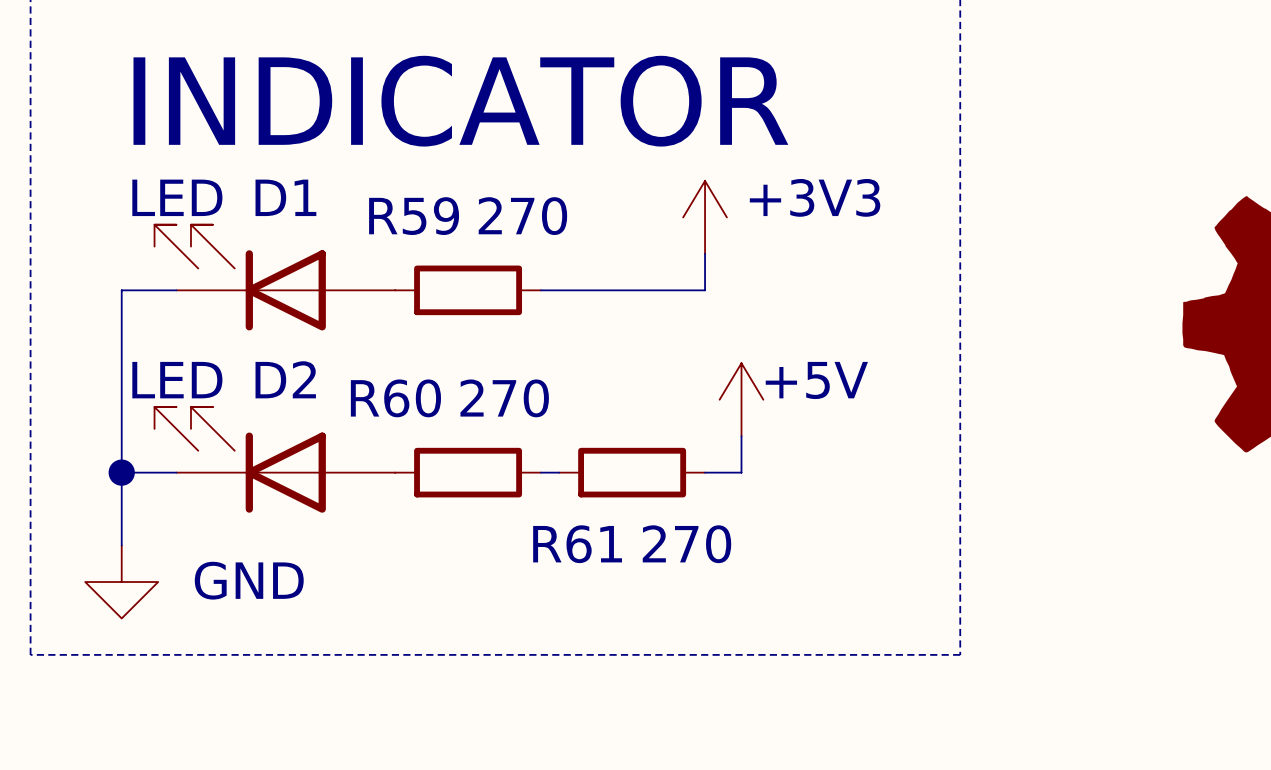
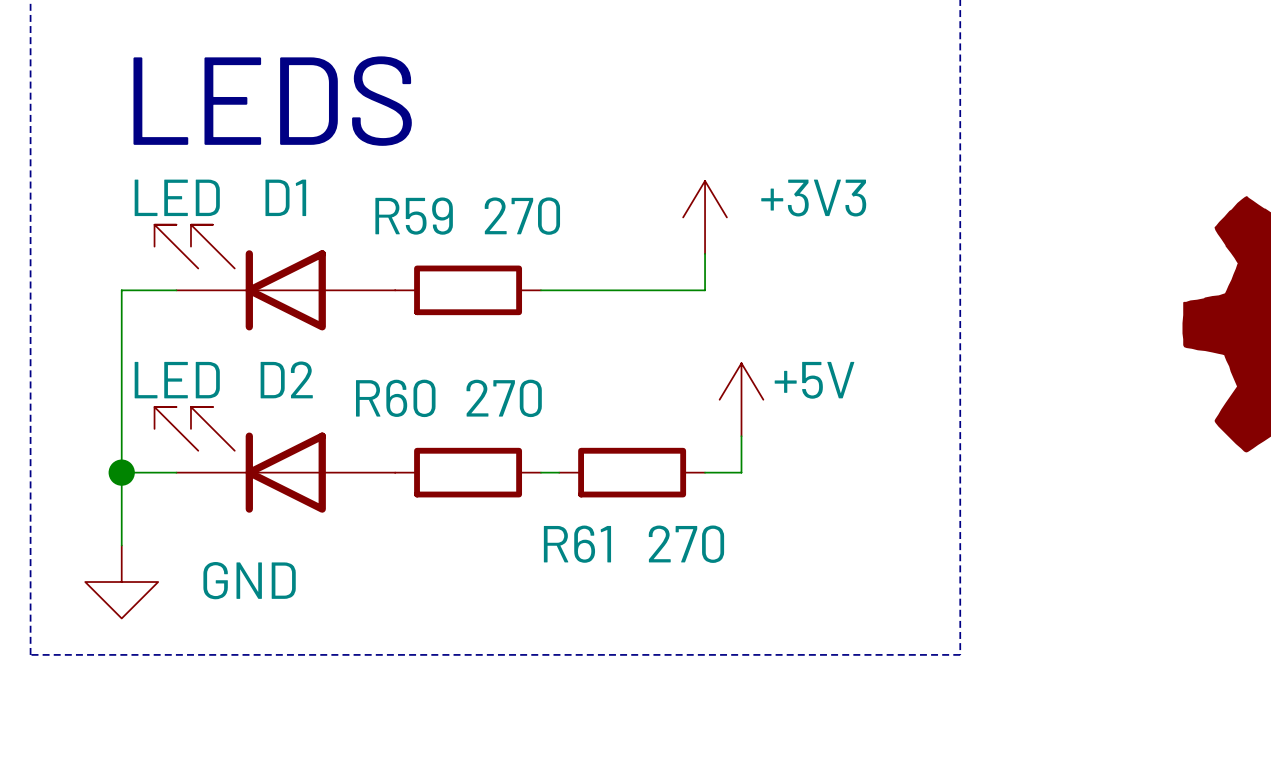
text: INDICATOR (460, 101) -> LEDS (272, 101)

